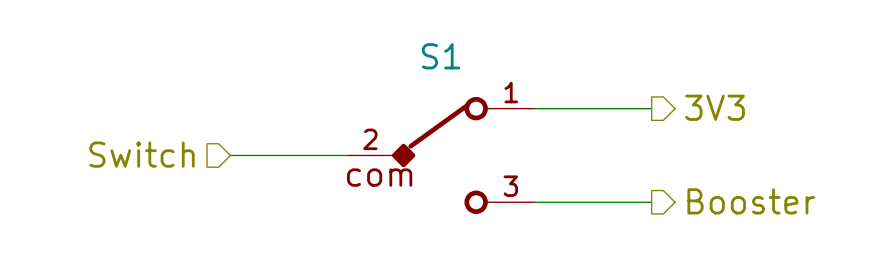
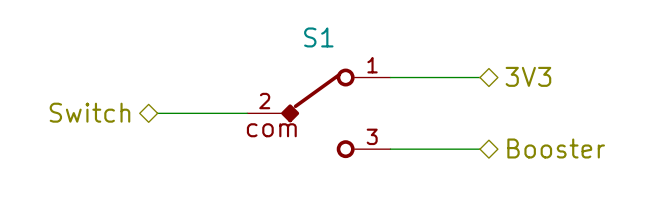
hierarchical label shape: output (715, 107) -> bidirectional (528, 76)
hierarchical label shape: input (142, 154) -> bidirectional (89, 112)
hierarchical label shape: output (751, 201) -> bidirectional (556, 148)

